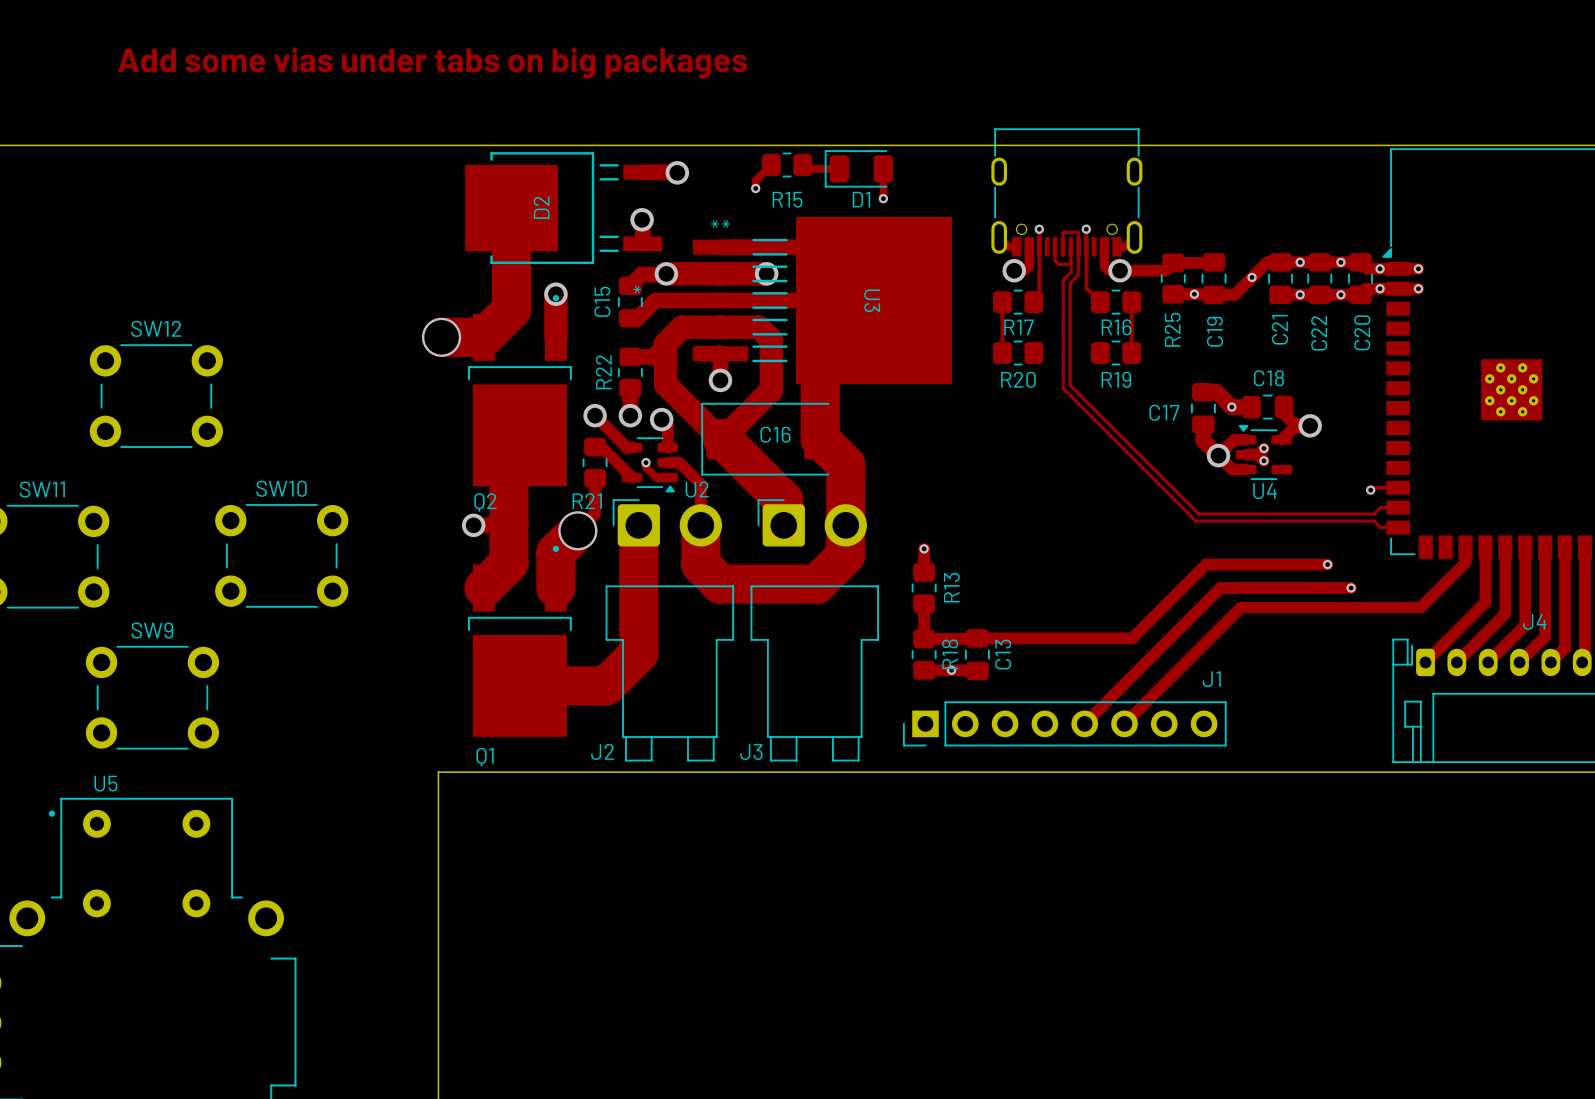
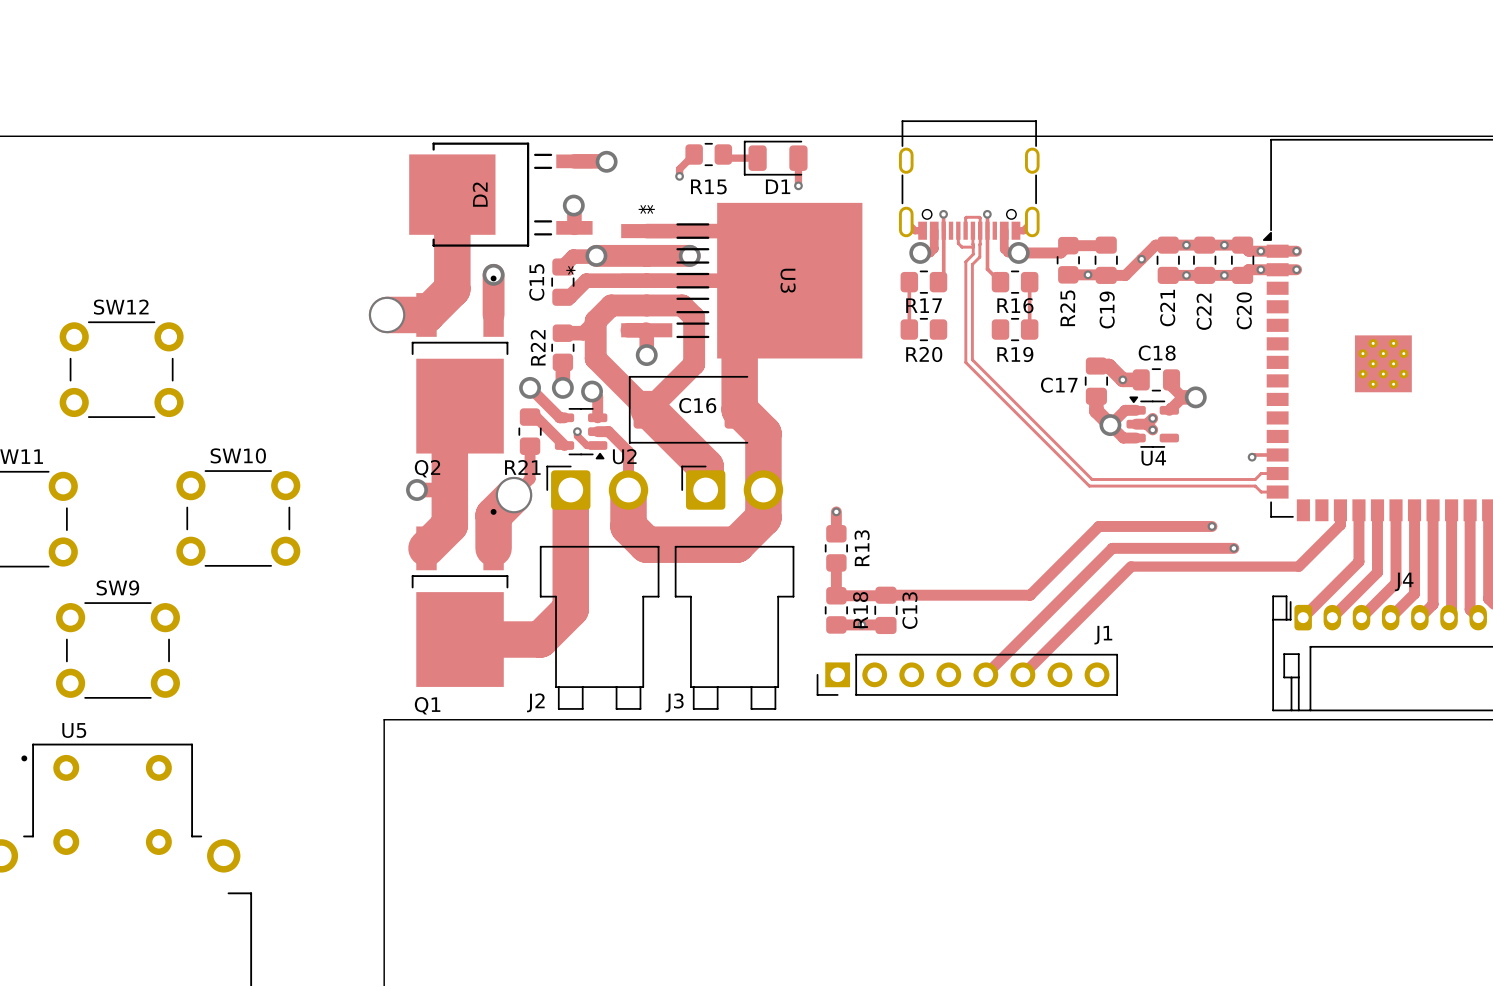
text: Add some vias under tabs on big packages (432, 63) -> none

